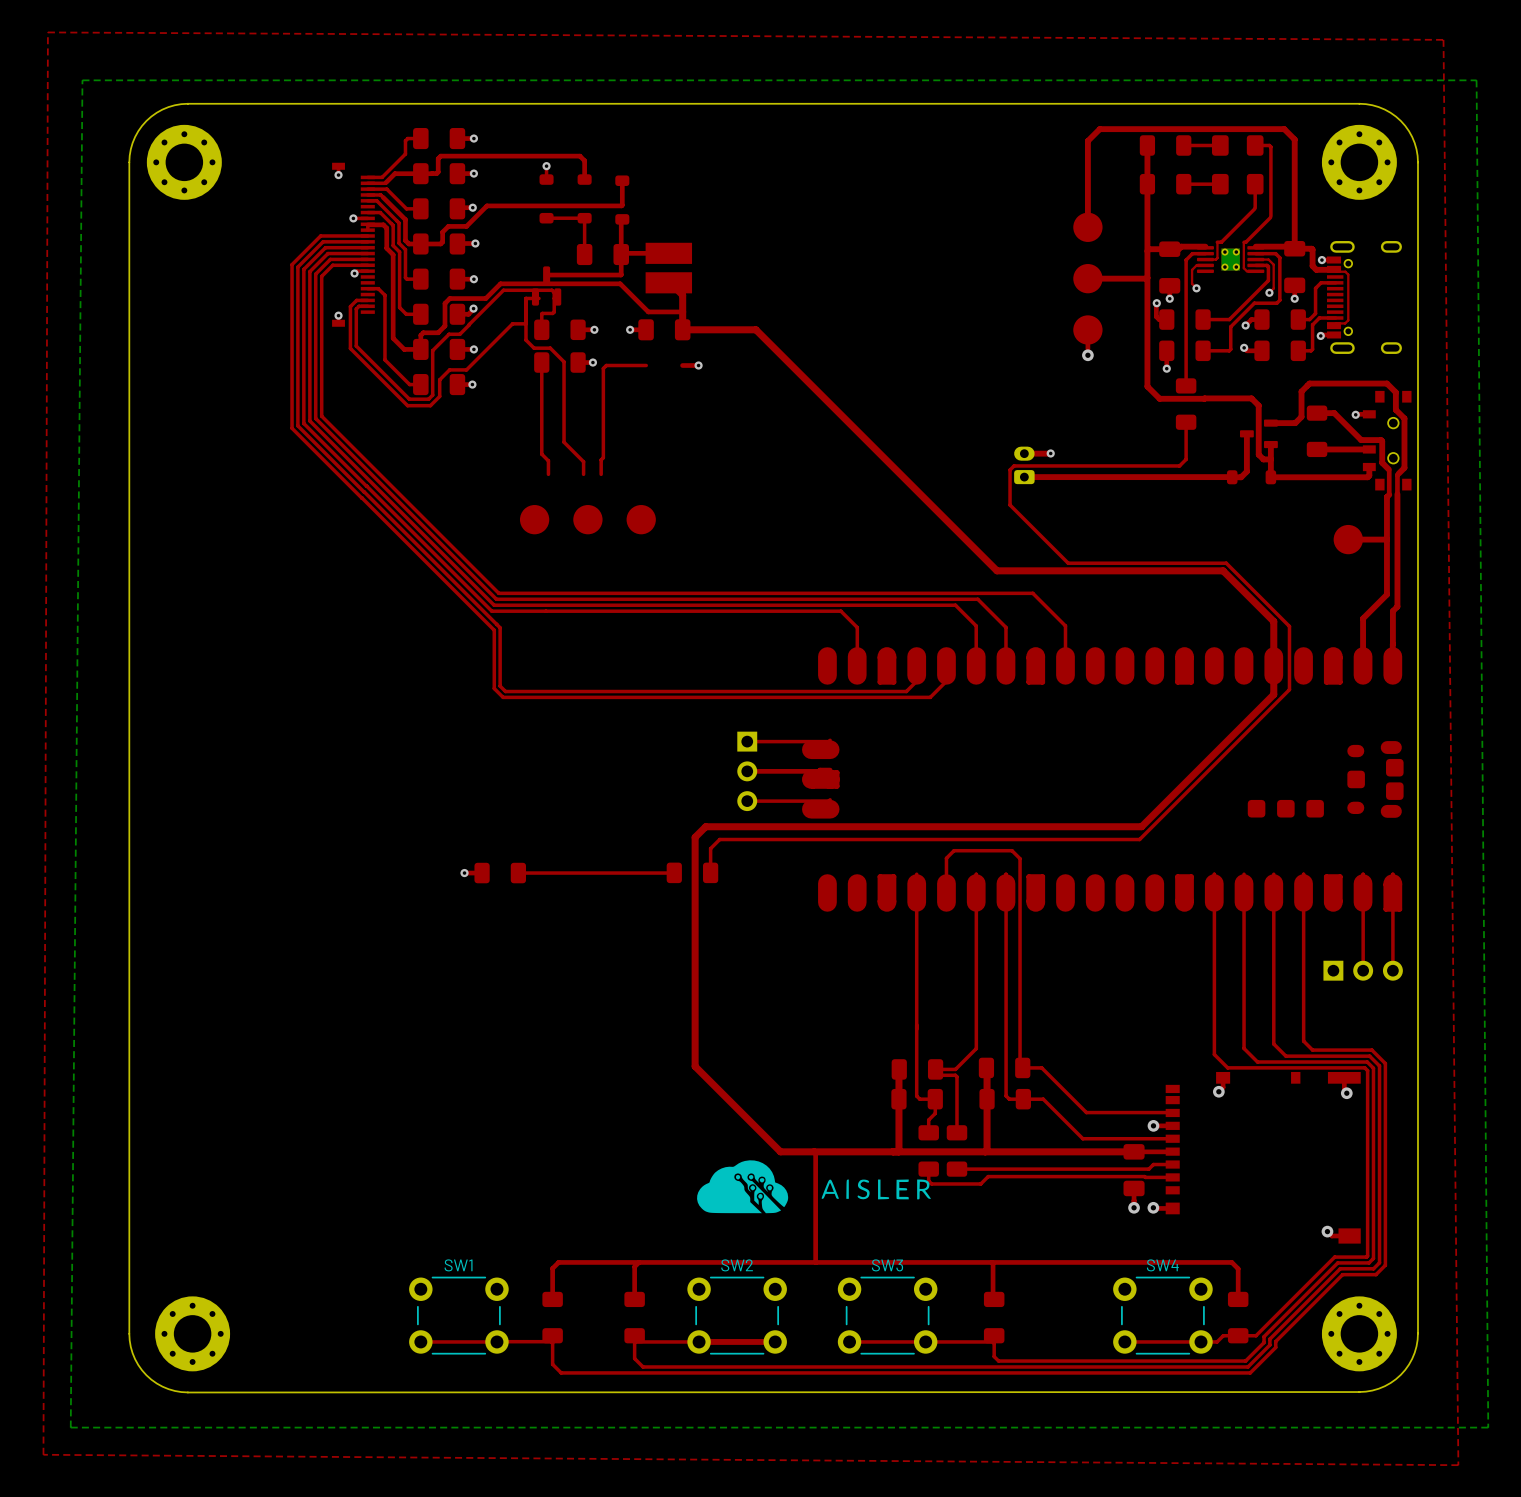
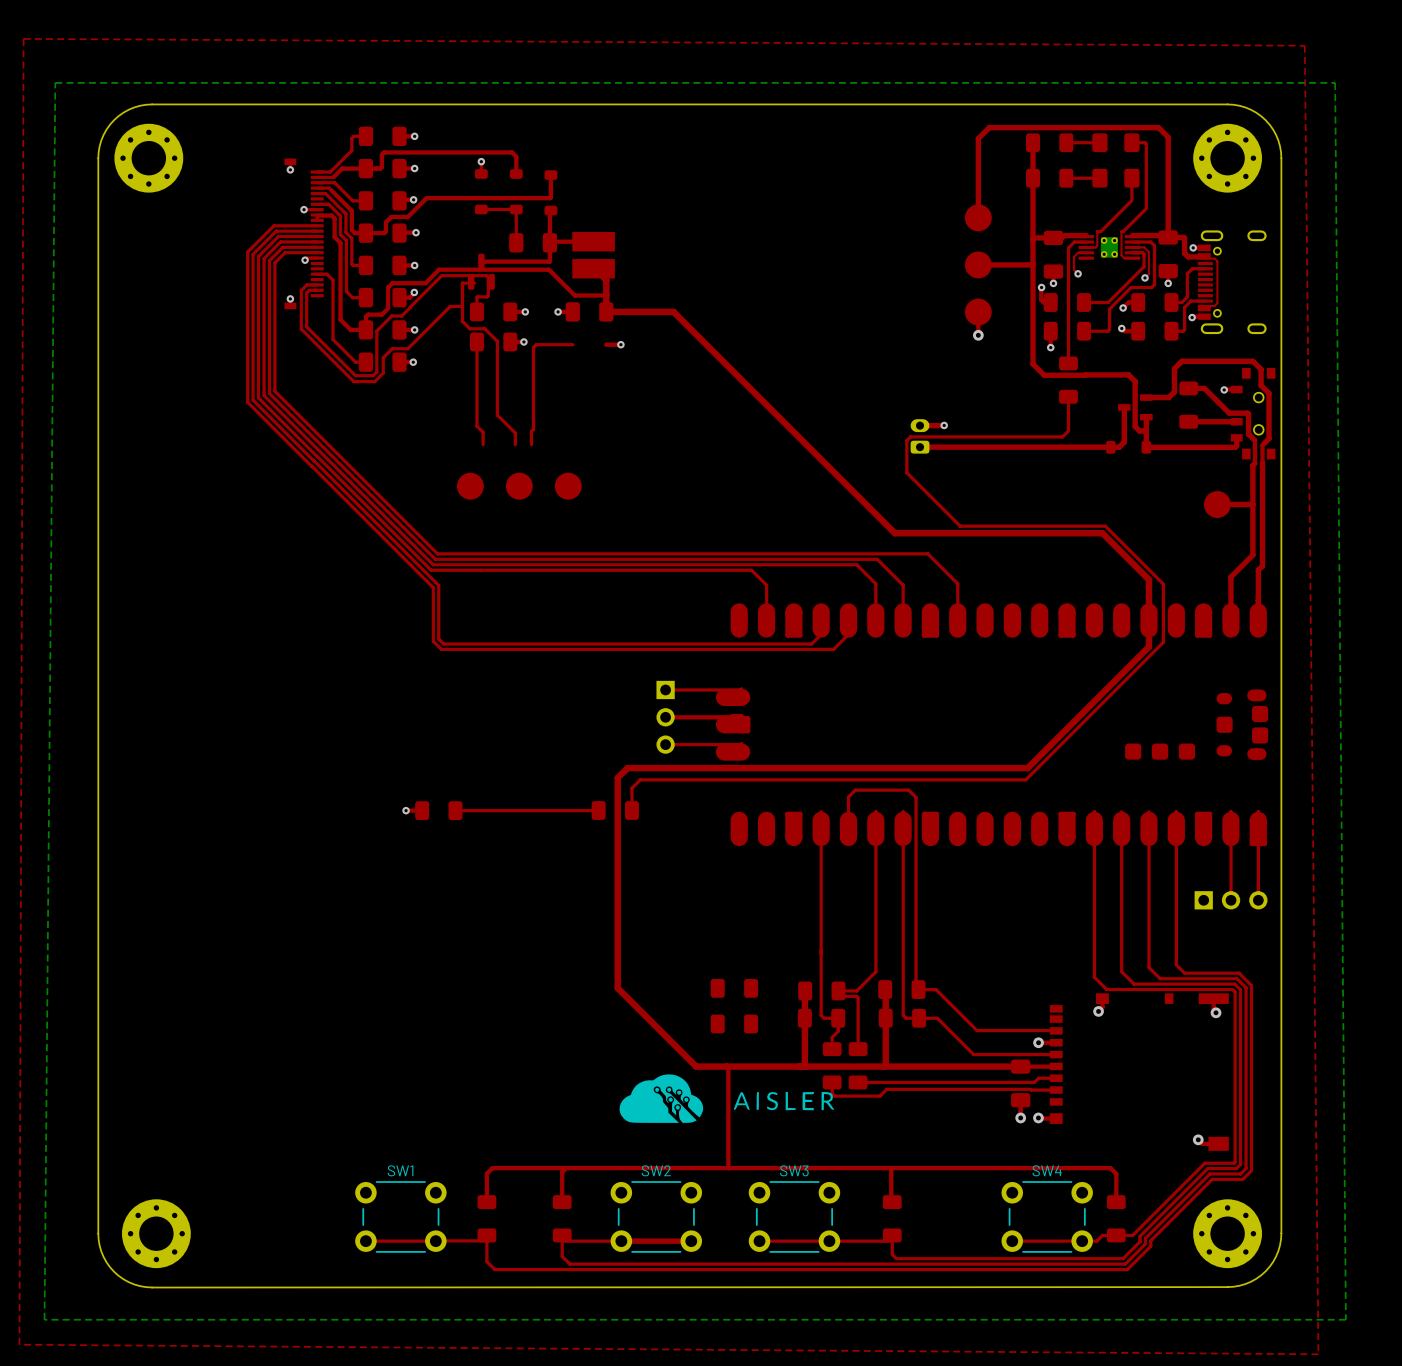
part: none -> (734, 988)
part: none -> (734, 1023)

